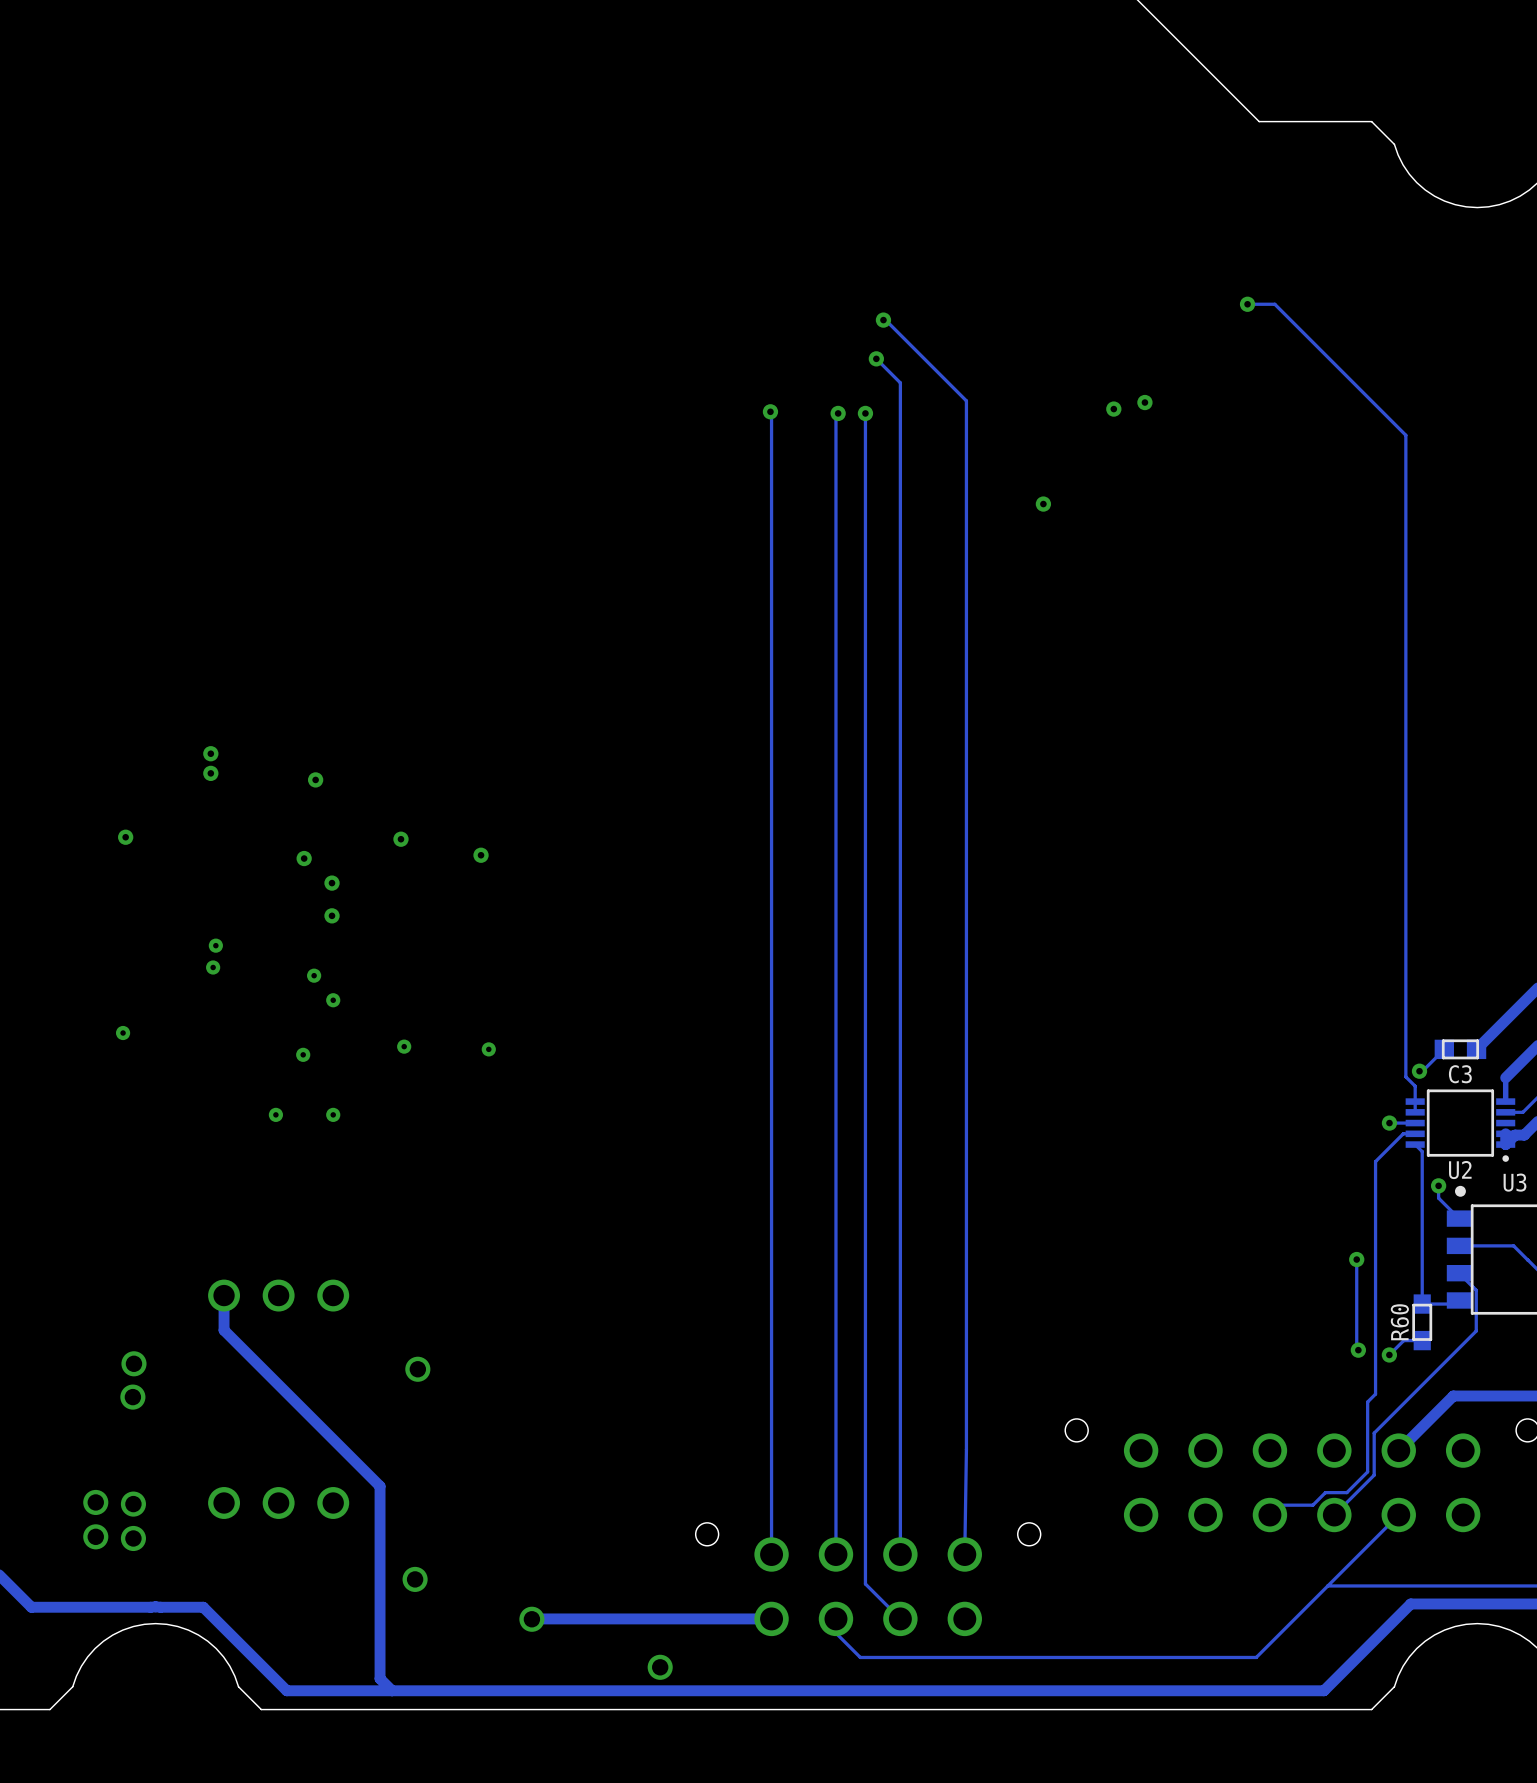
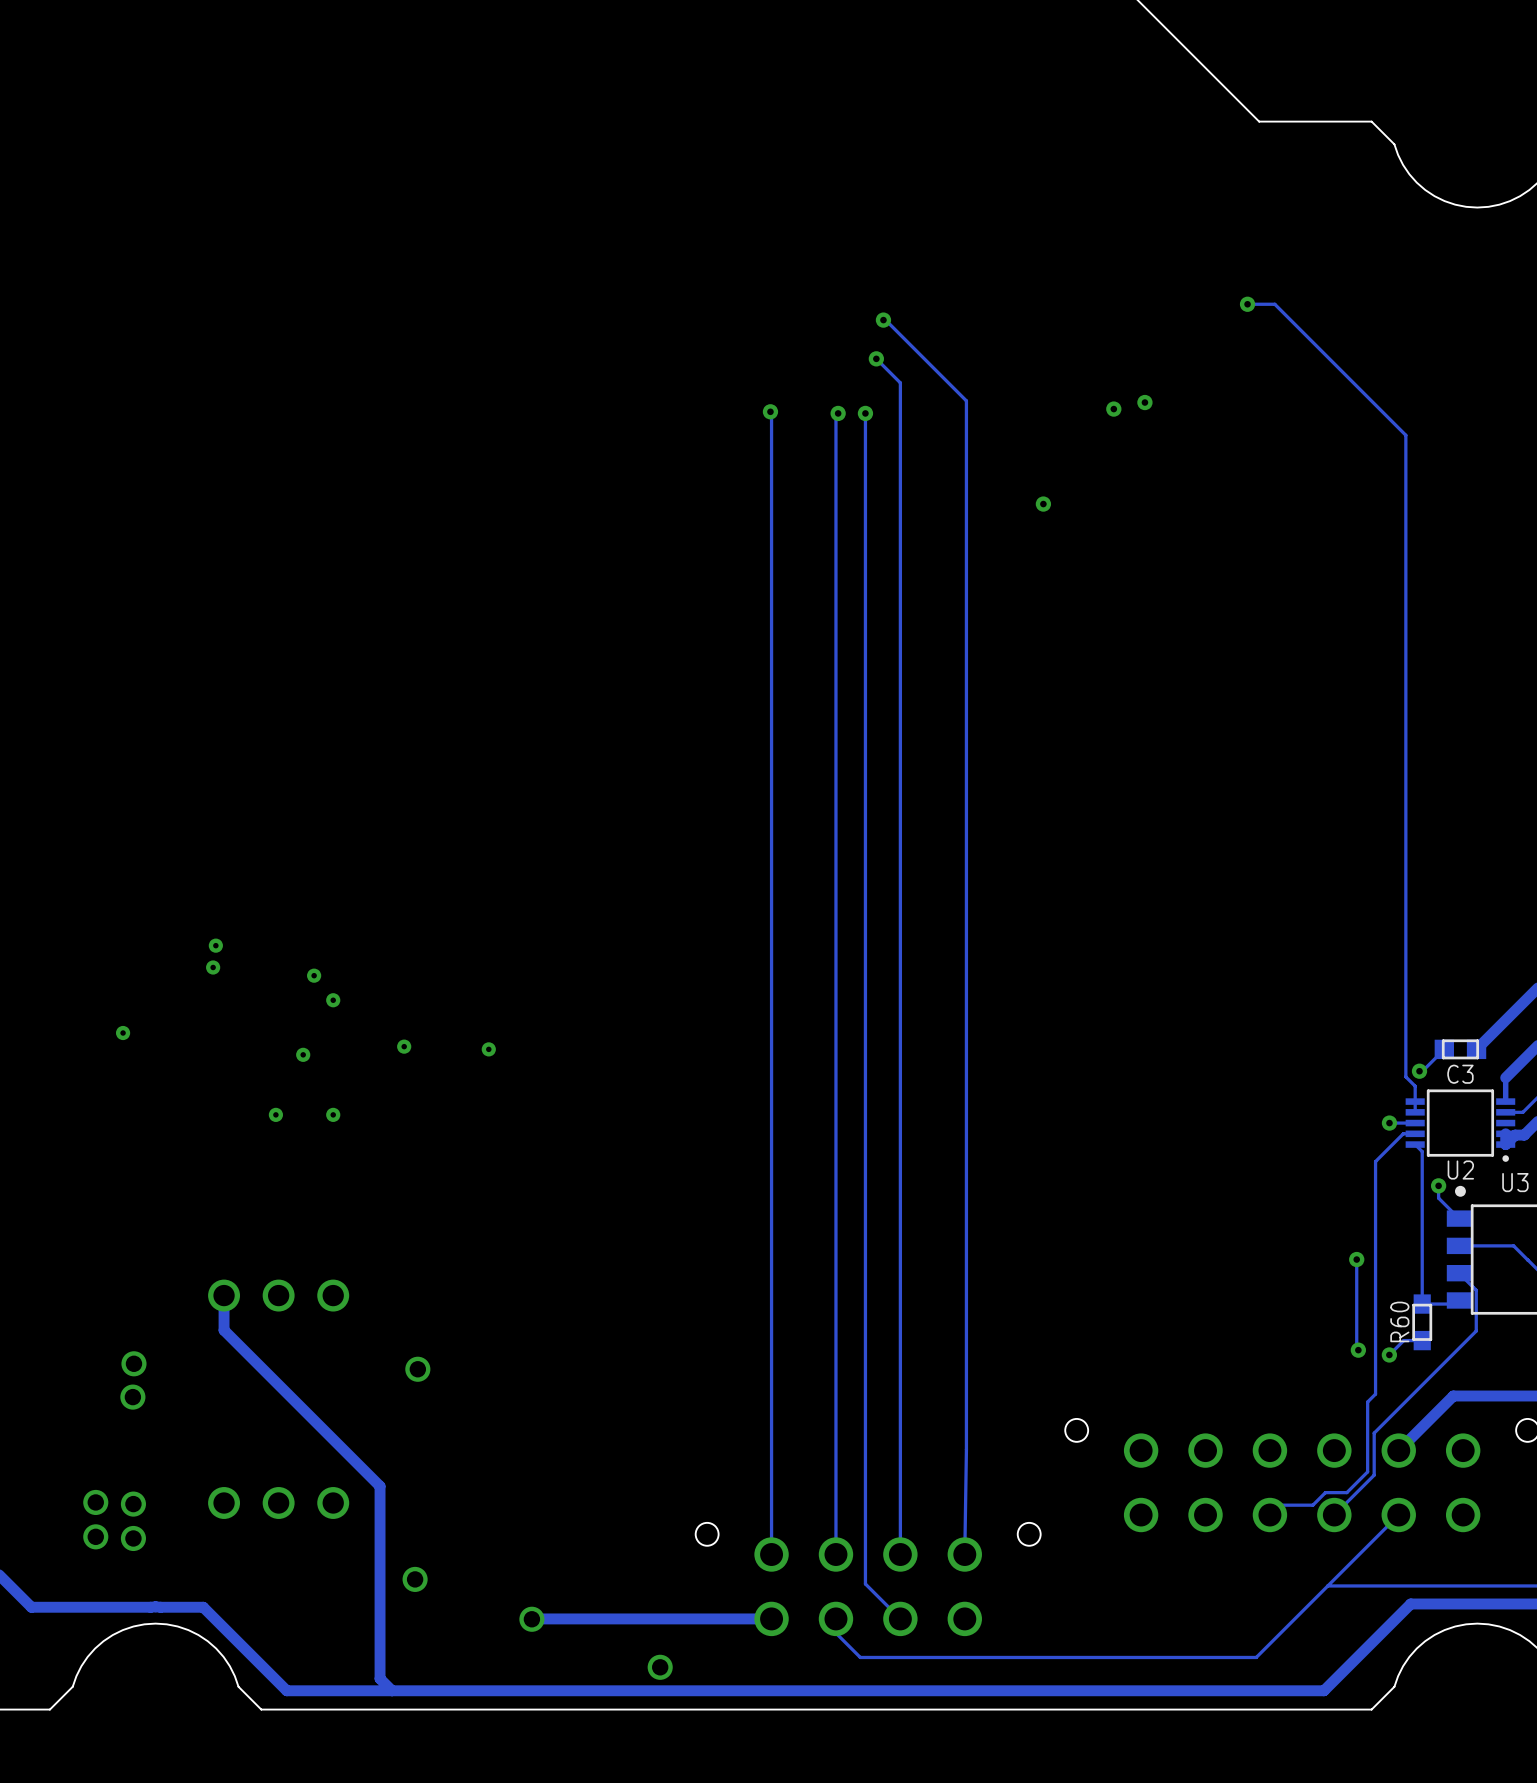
via: (210, 753) -> none
via: (210, 773) -> none
via: (315, 779) -> none
via: (125, 837) -> none
via: (400, 839) -> none
via: (481, 855) -> none
via: (304, 858) -> none
via: (332, 883) -> none
via: (332, 915) -> none

